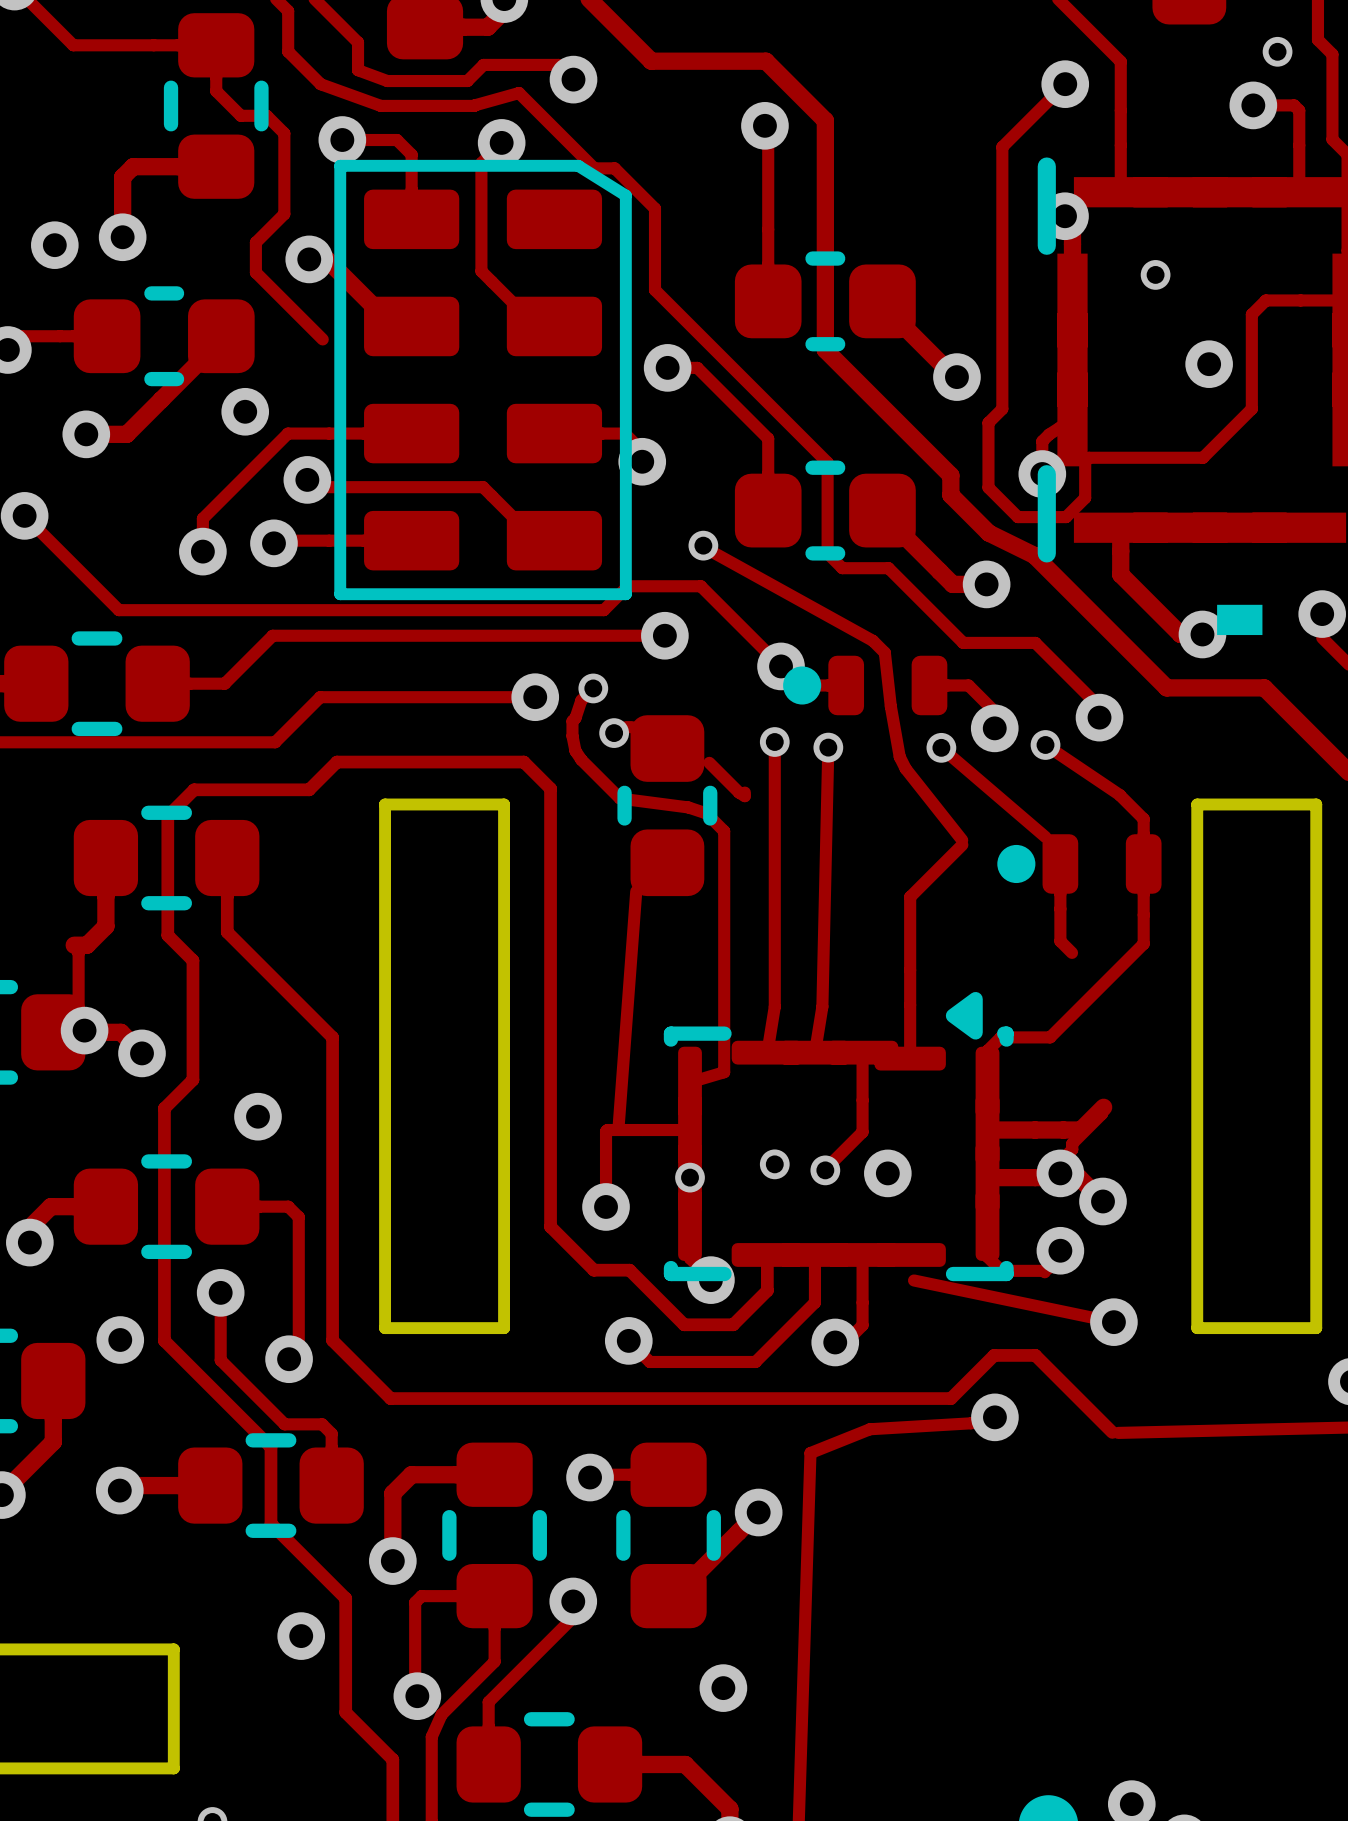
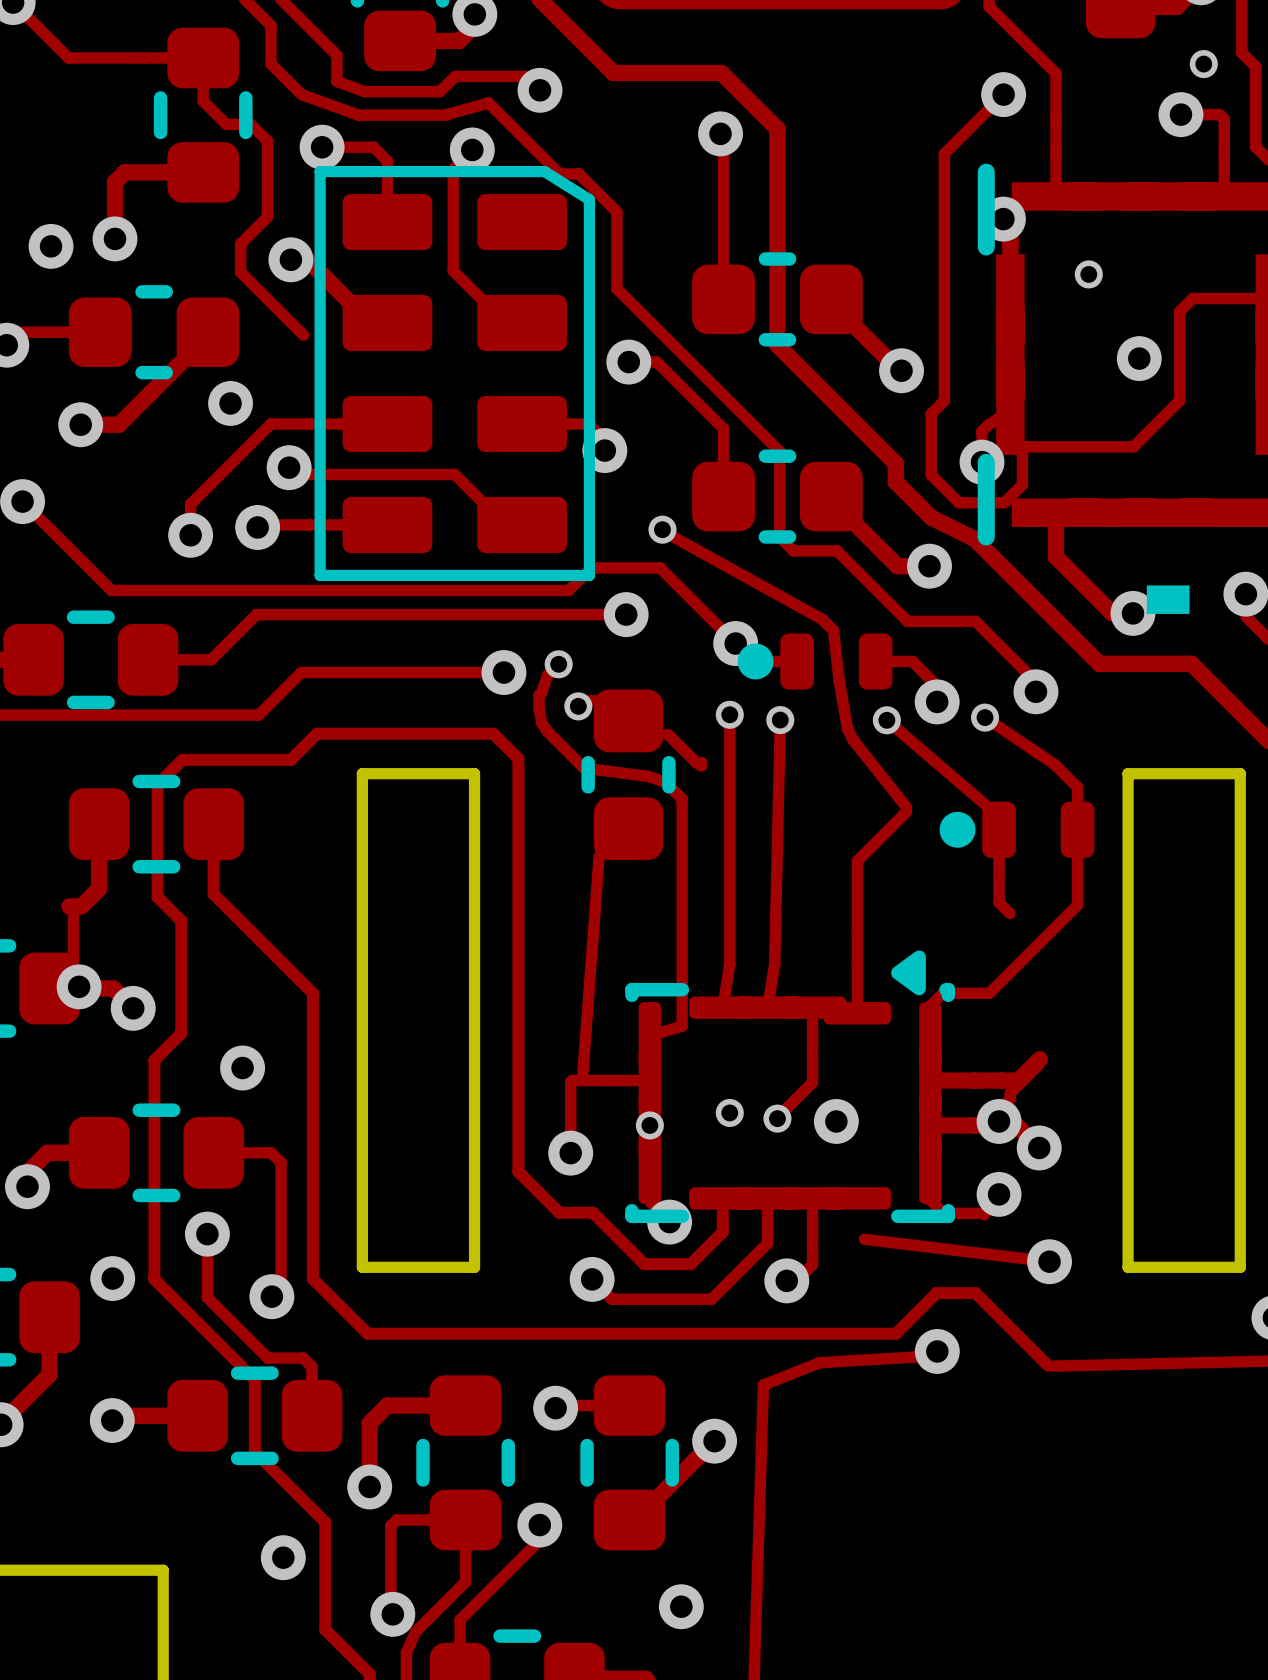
track: (914, 1280) (1113, 1322) -> (864, 1239) (1049, 1261)

